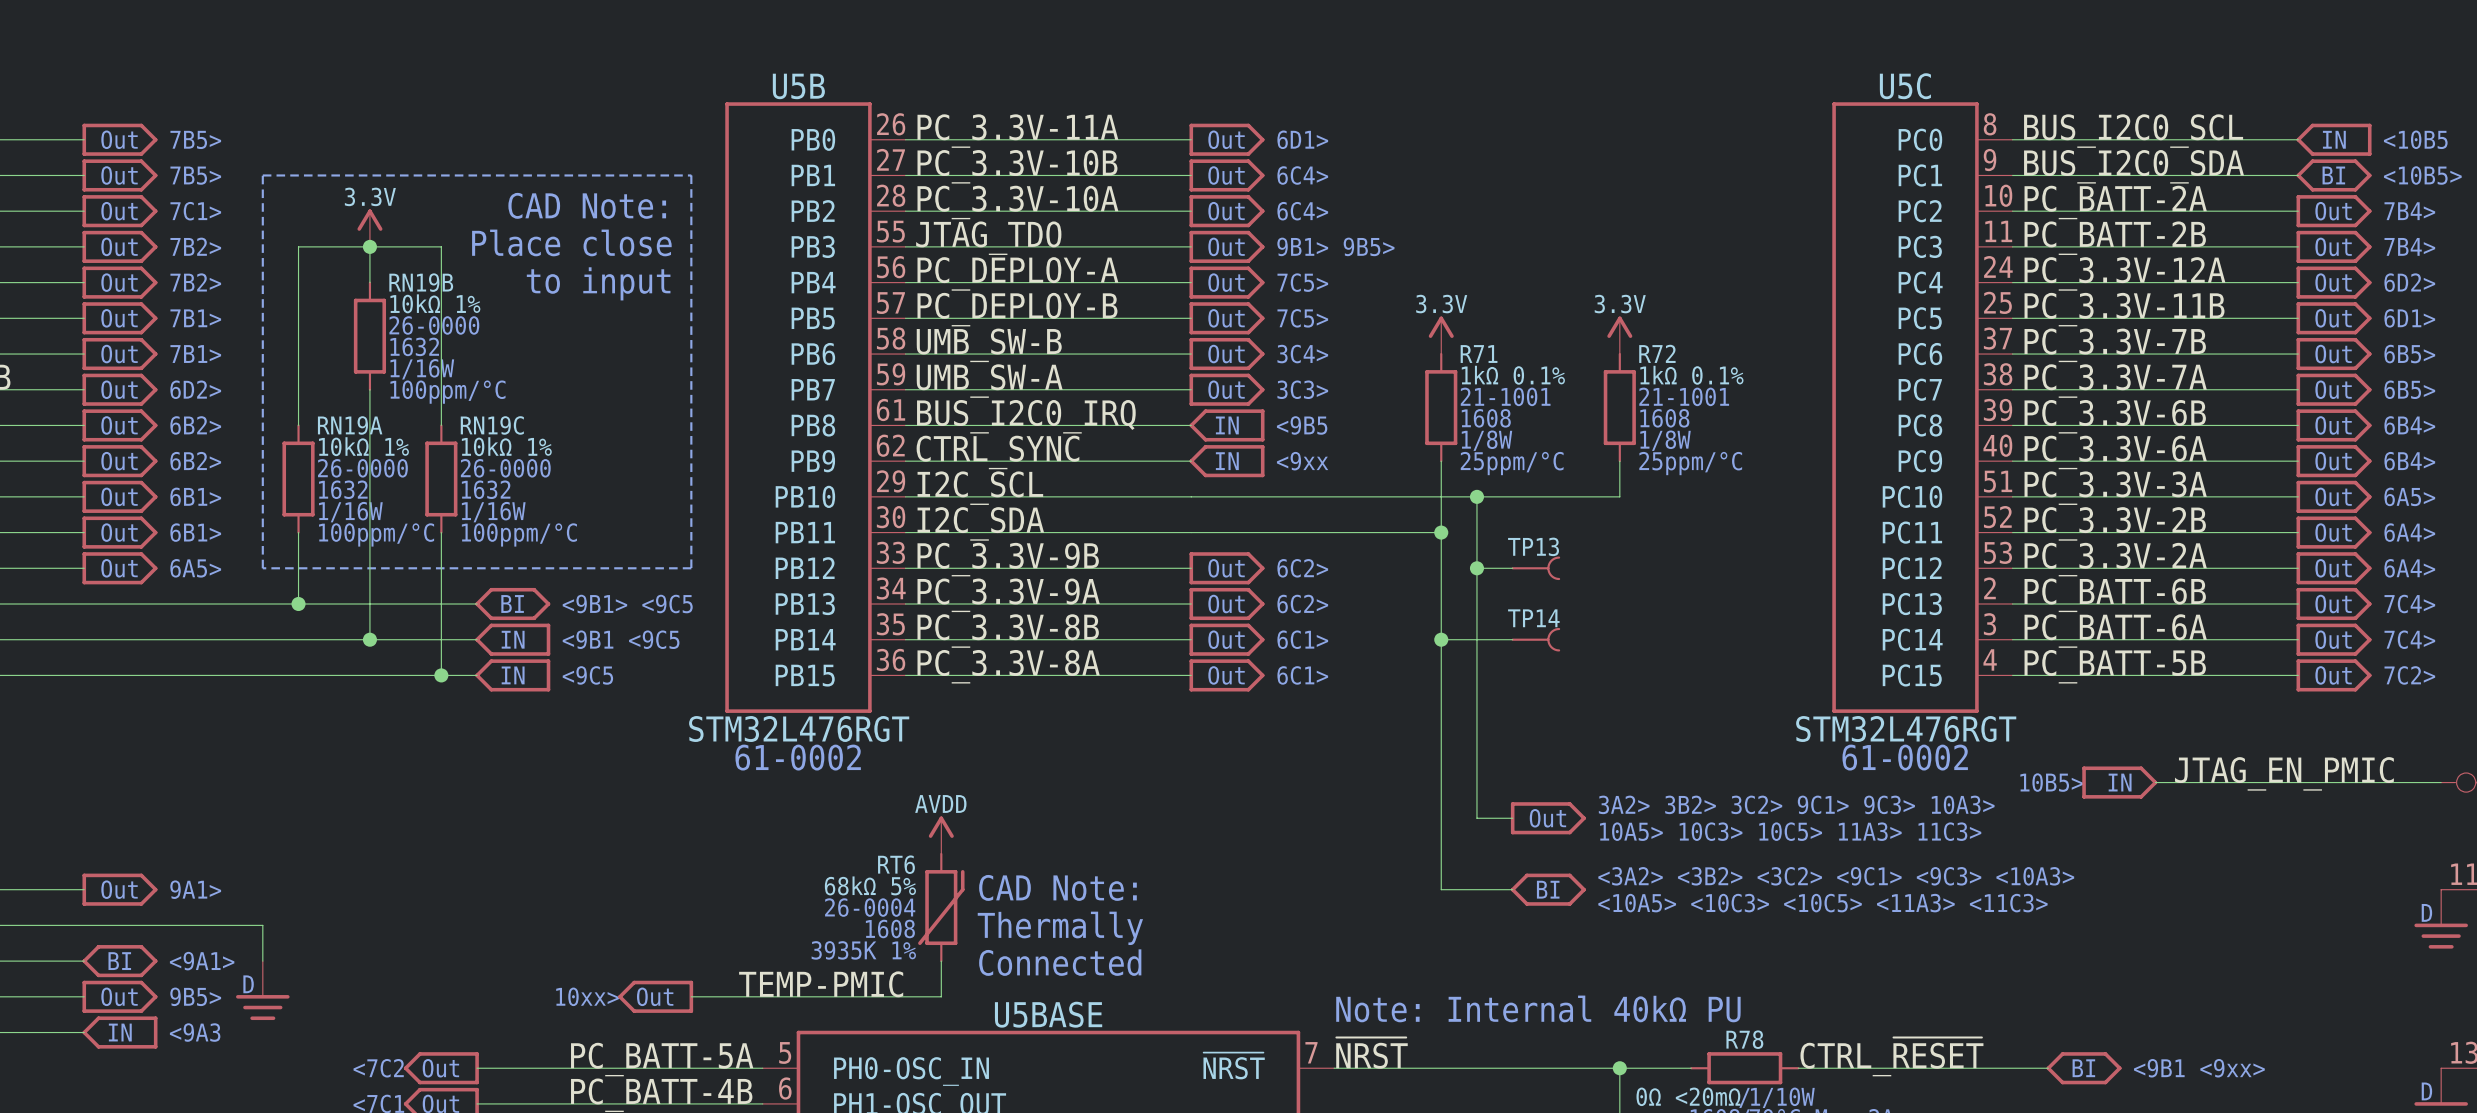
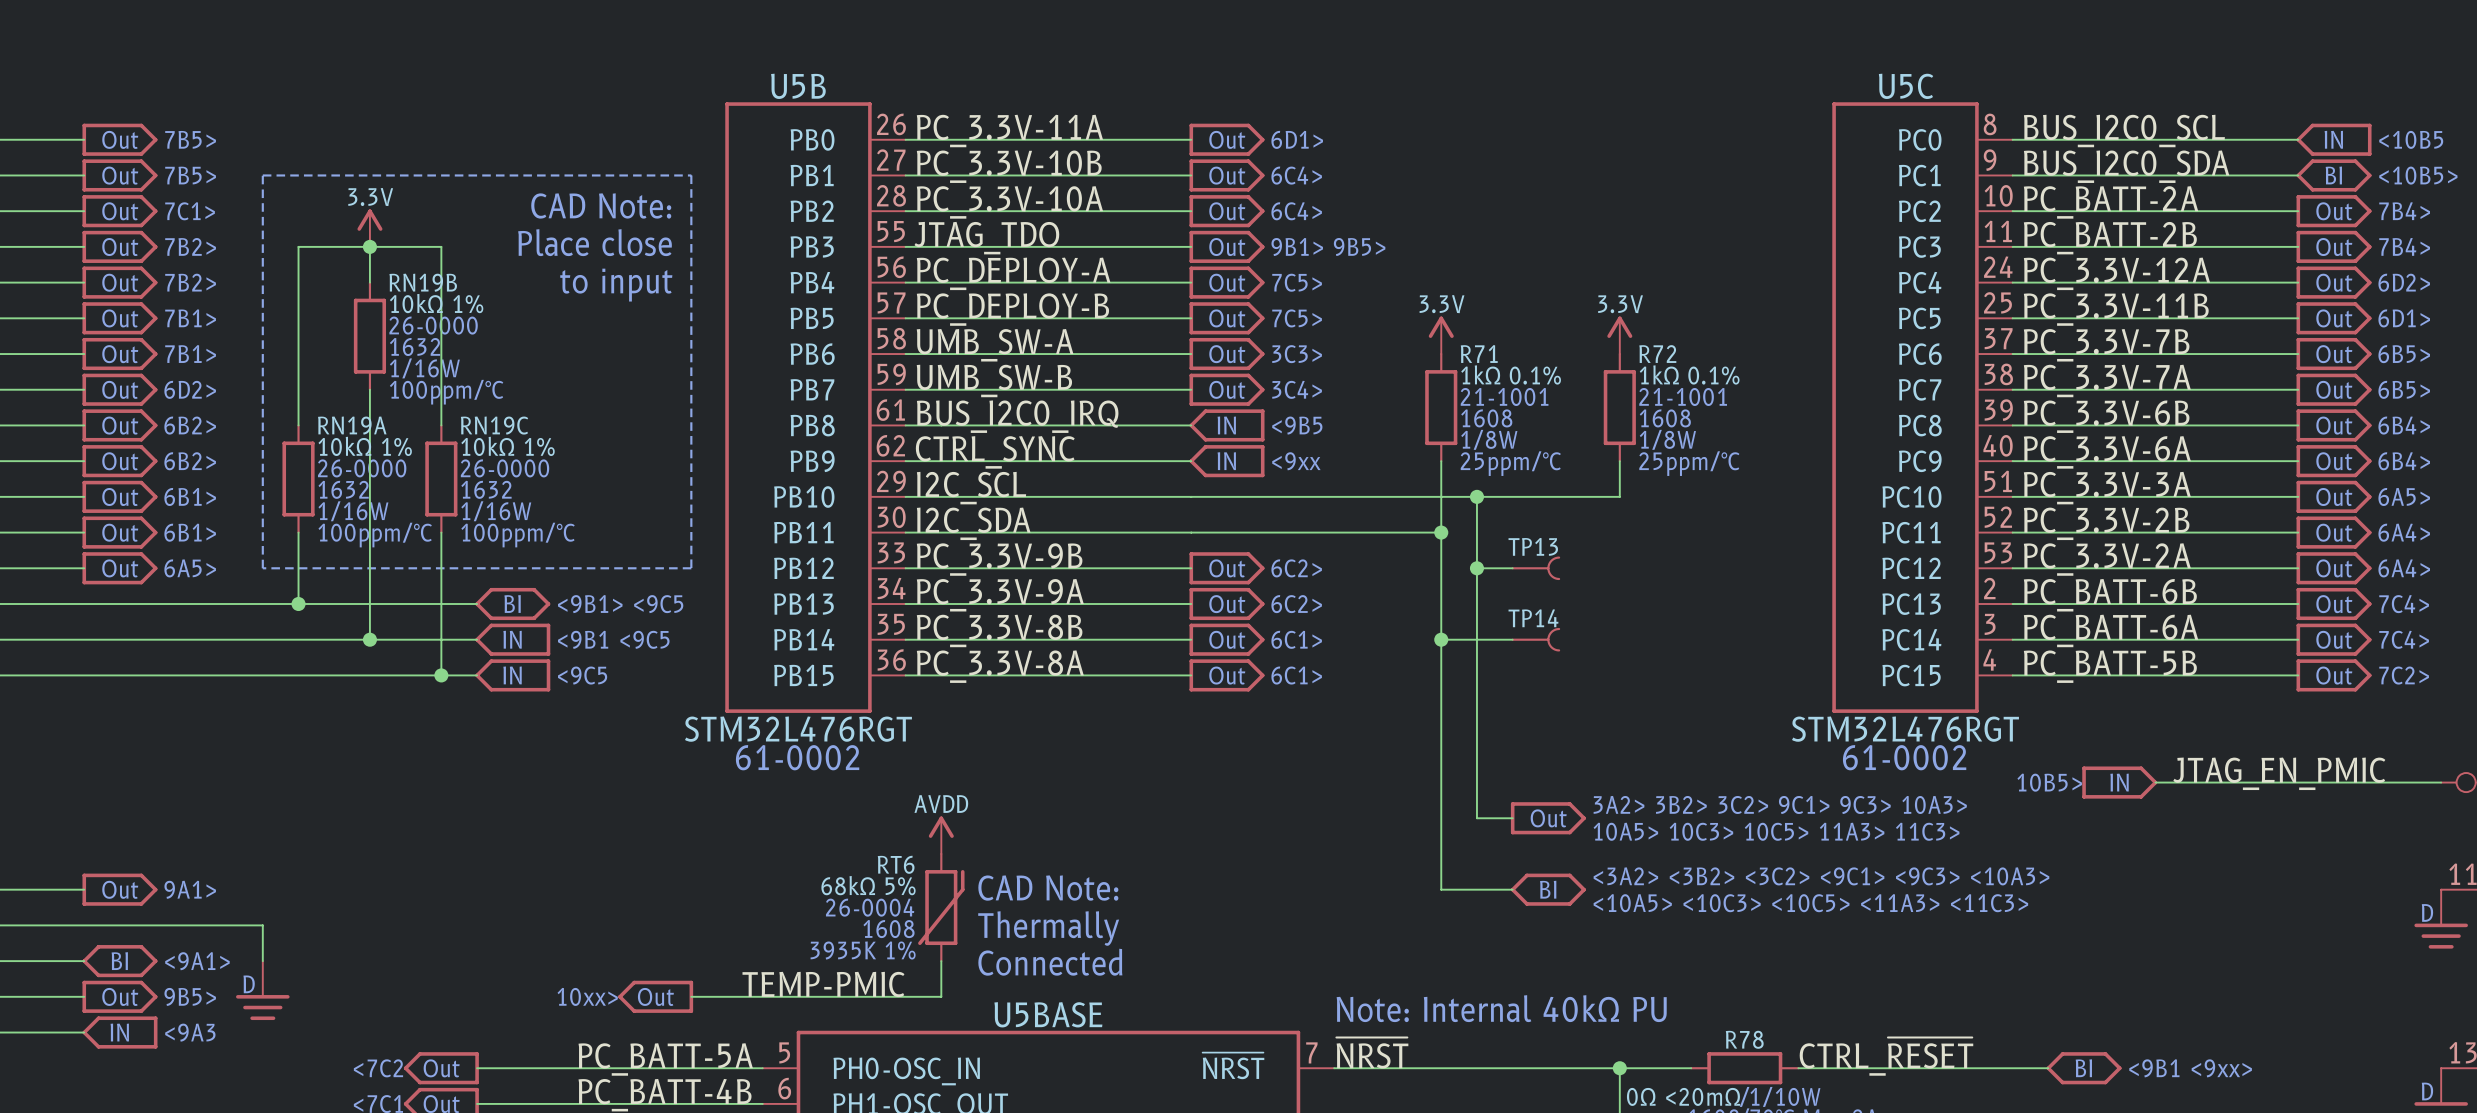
label: UMB_SW-B (989, 345) -> UMB_SW-A (995, 345)
text: 3C4> (1302, 354) -> 3C3> (1297, 354)
label: UMB_SW-A (989, 381) -> UMB_SW-B (994, 380)
text: 3C3> (1302, 389) -> 3C4> (1297, 389)

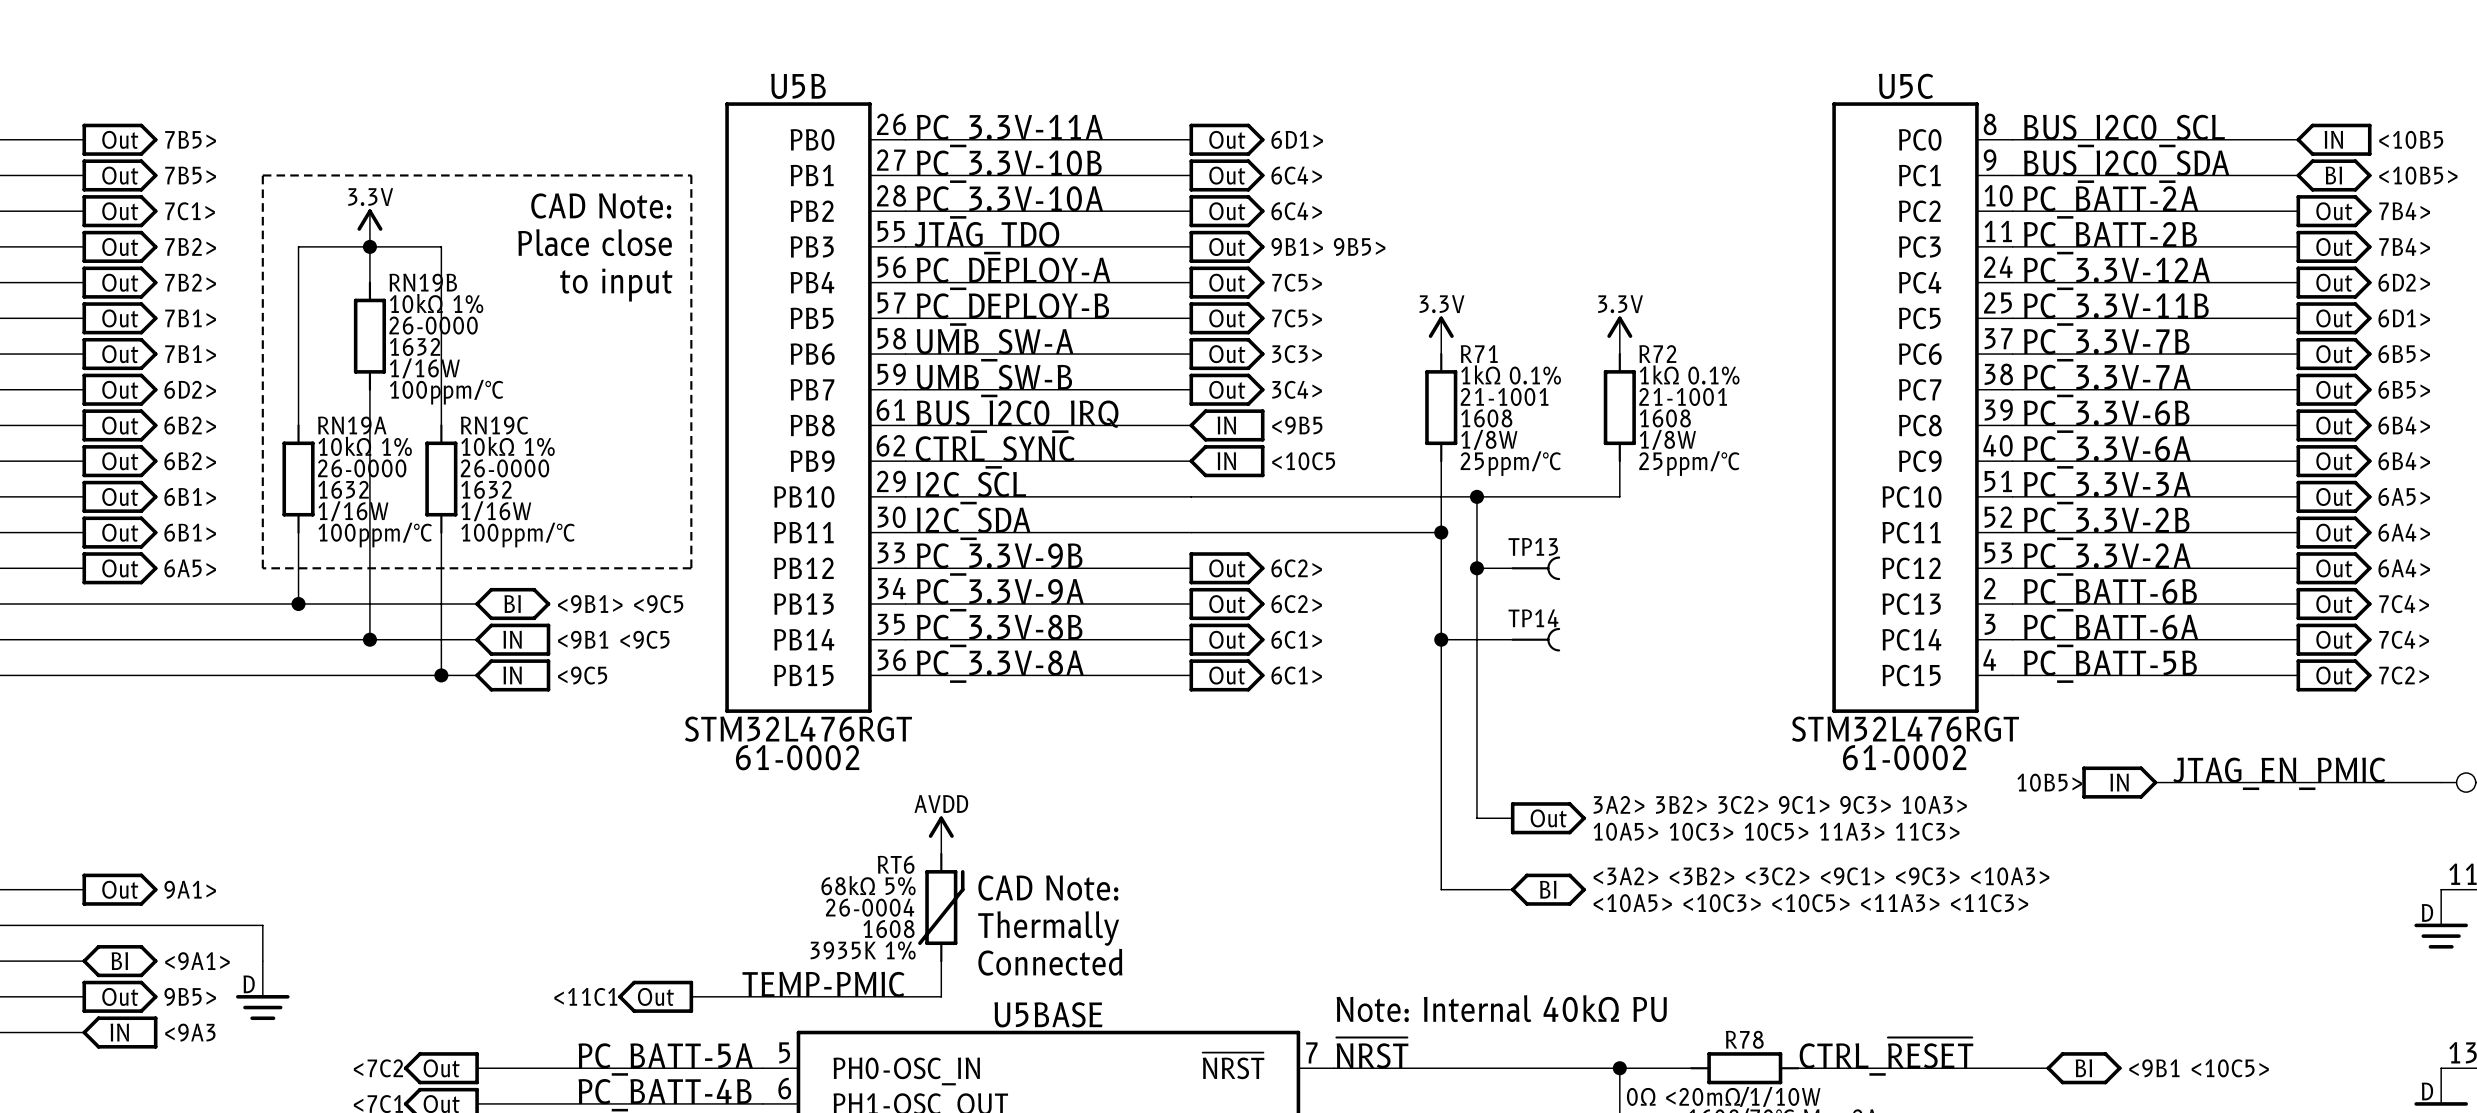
text: <9xx (1296, 461) -> <10C5 (1303, 461)
text: 10xx> (587, 996) -> <11C1 (585, 996)
text: <9B1 <9xx> (2190, 1068) -> <9B1 <10C5> (2199, 1068)

